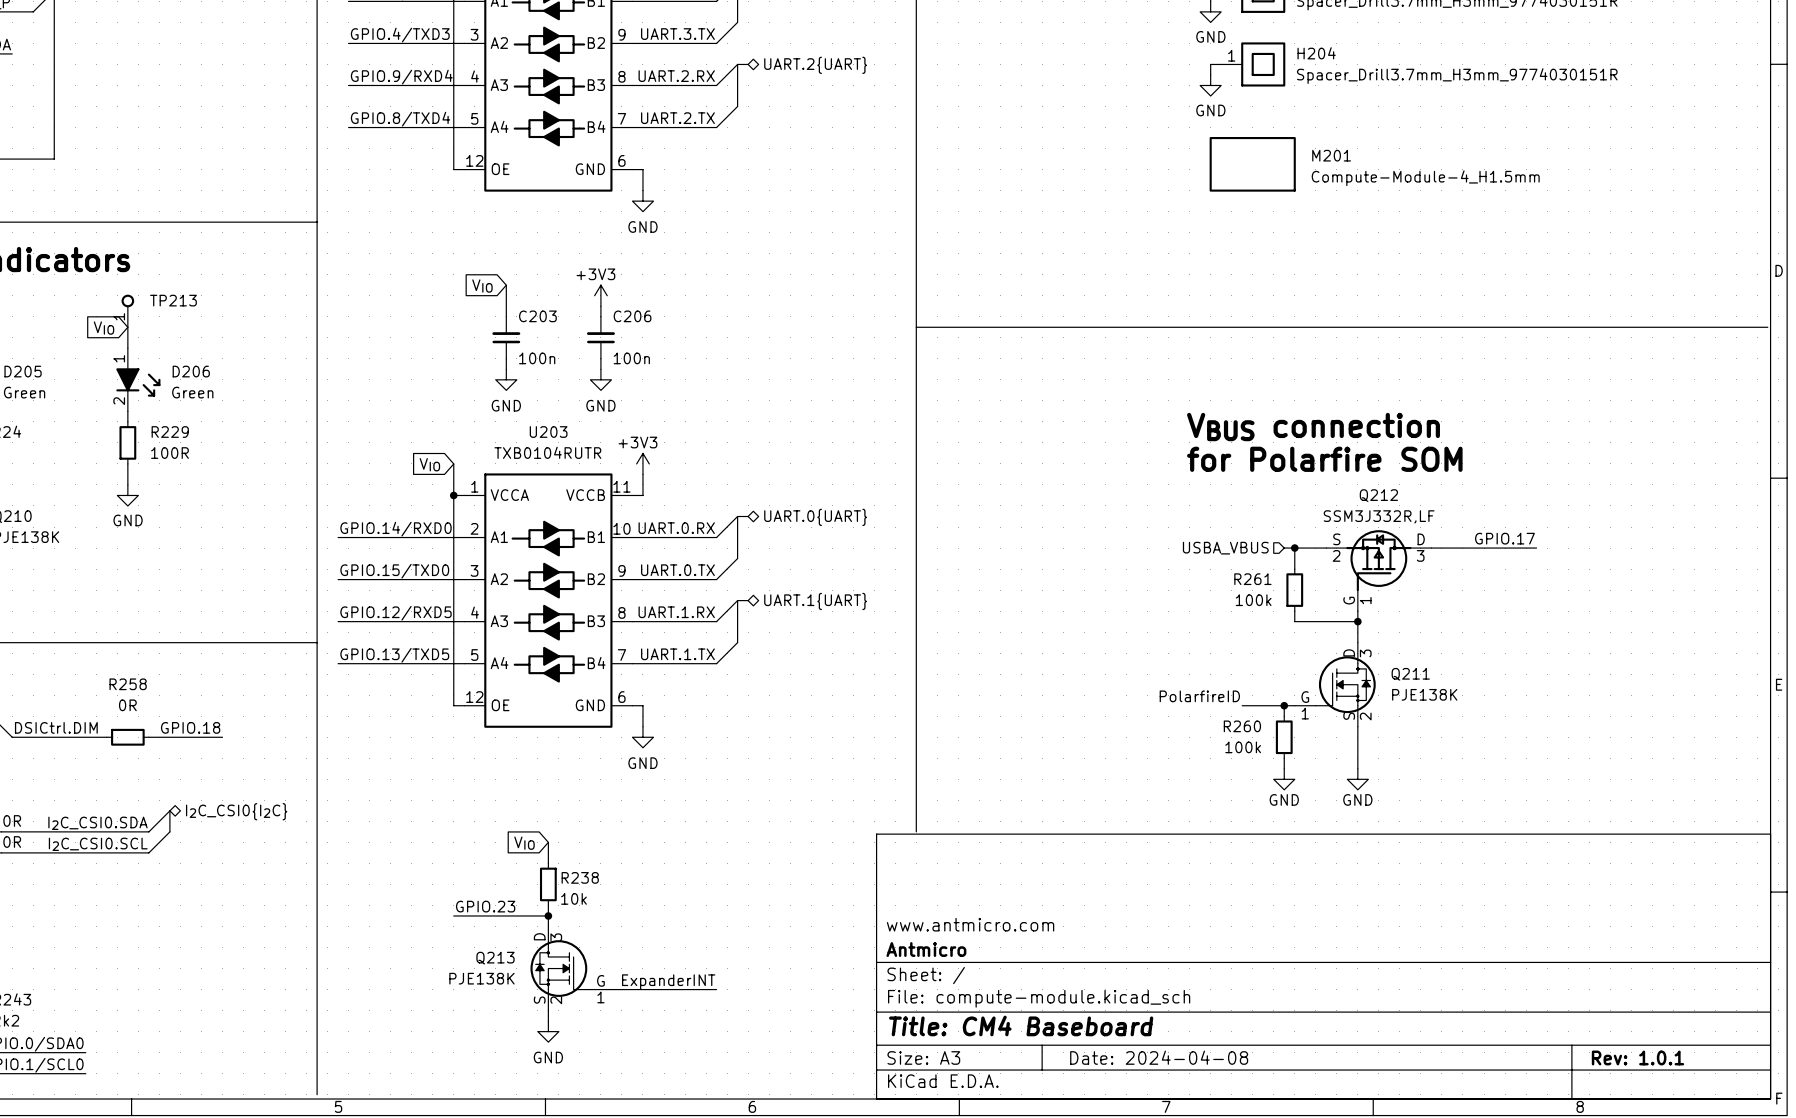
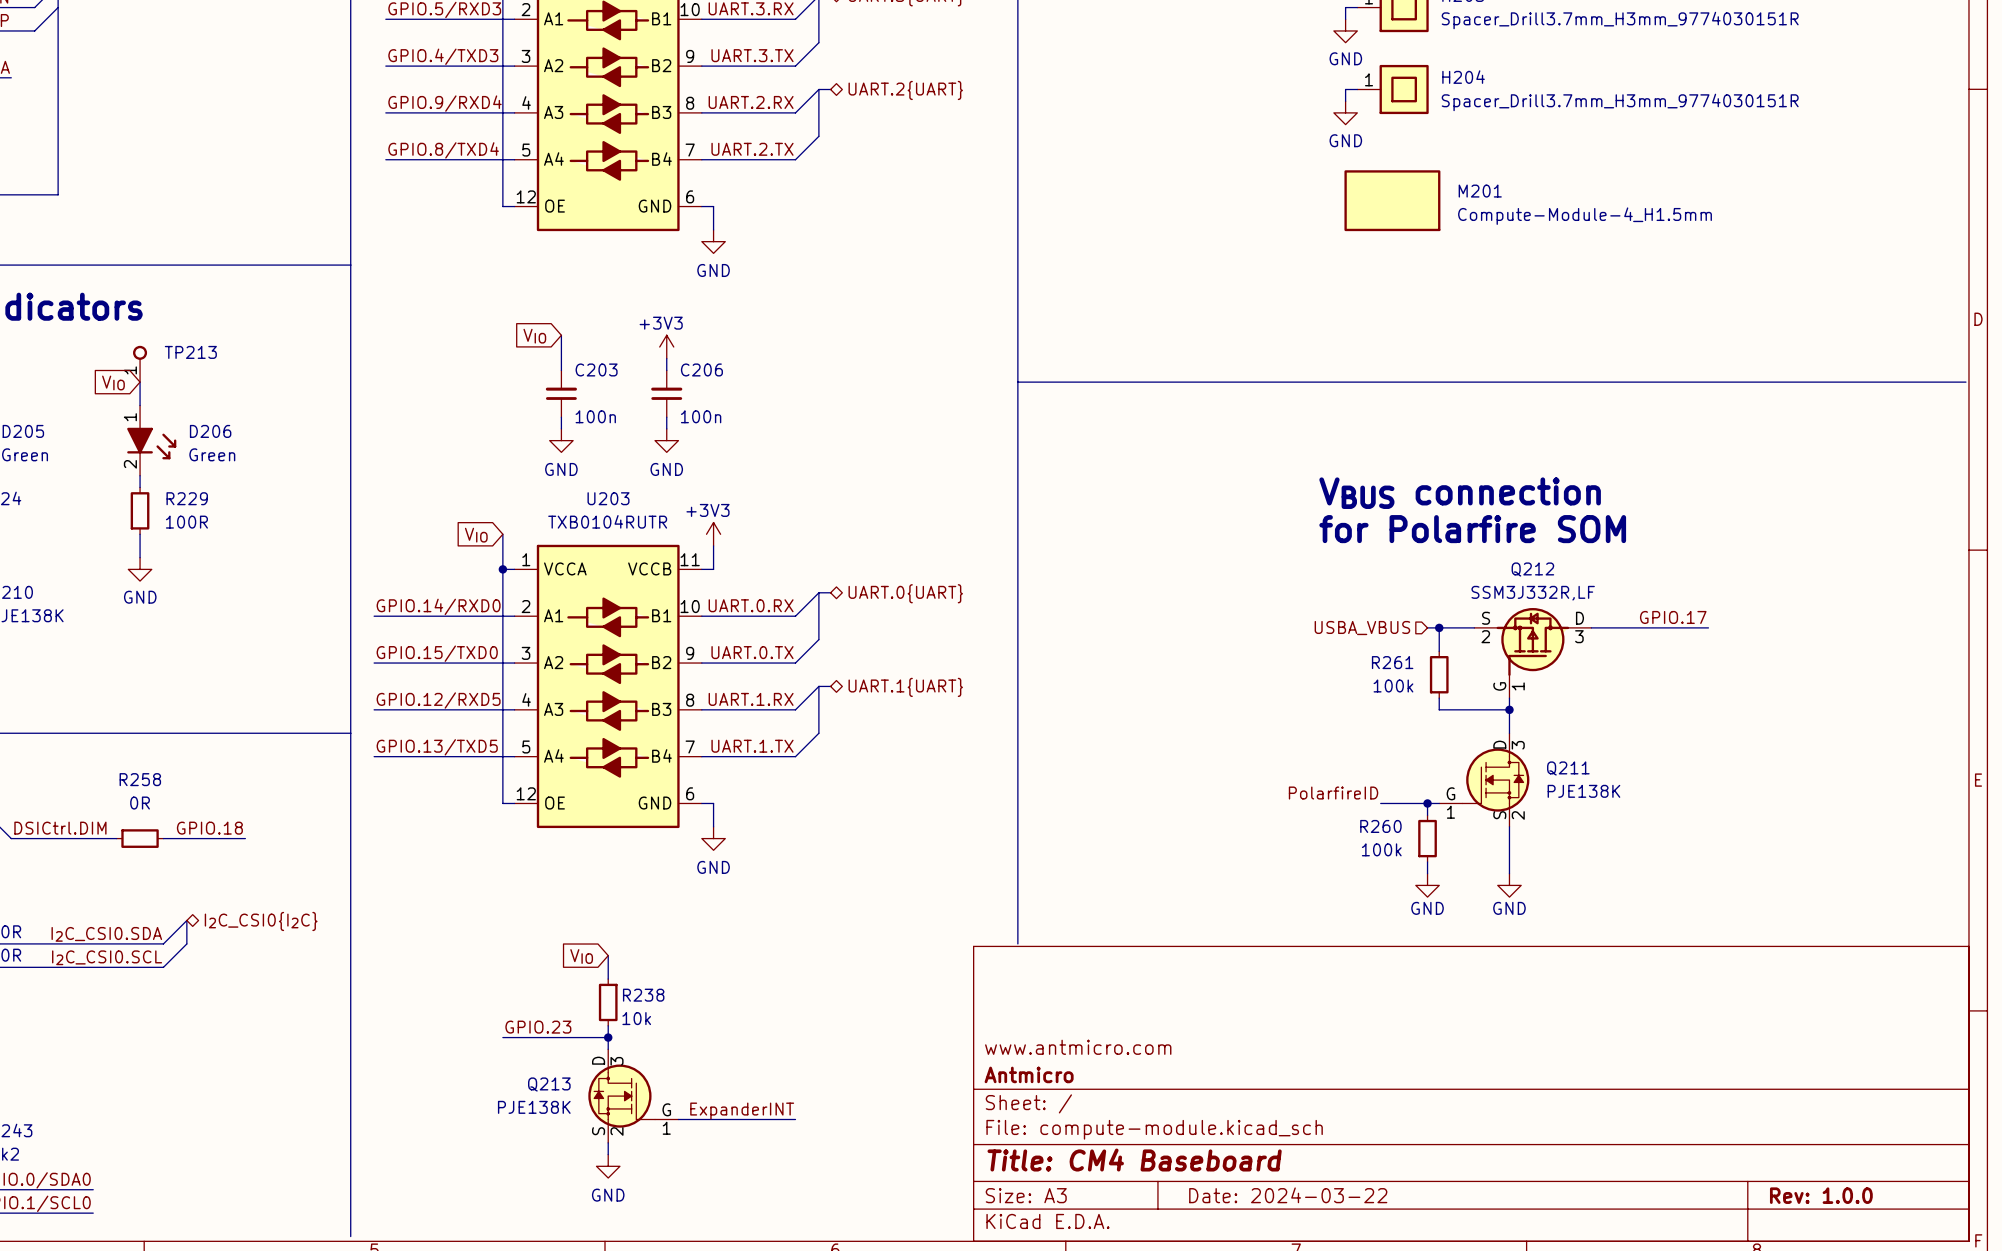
title block: Date: 2024-04-08 (1159, 1057) -> Date: 2024-03-22 (1288, 1195)
title block: Rev: 1.0.1 (1637, 1057) -> Rev: 1.0.0 (1821, 1195)

